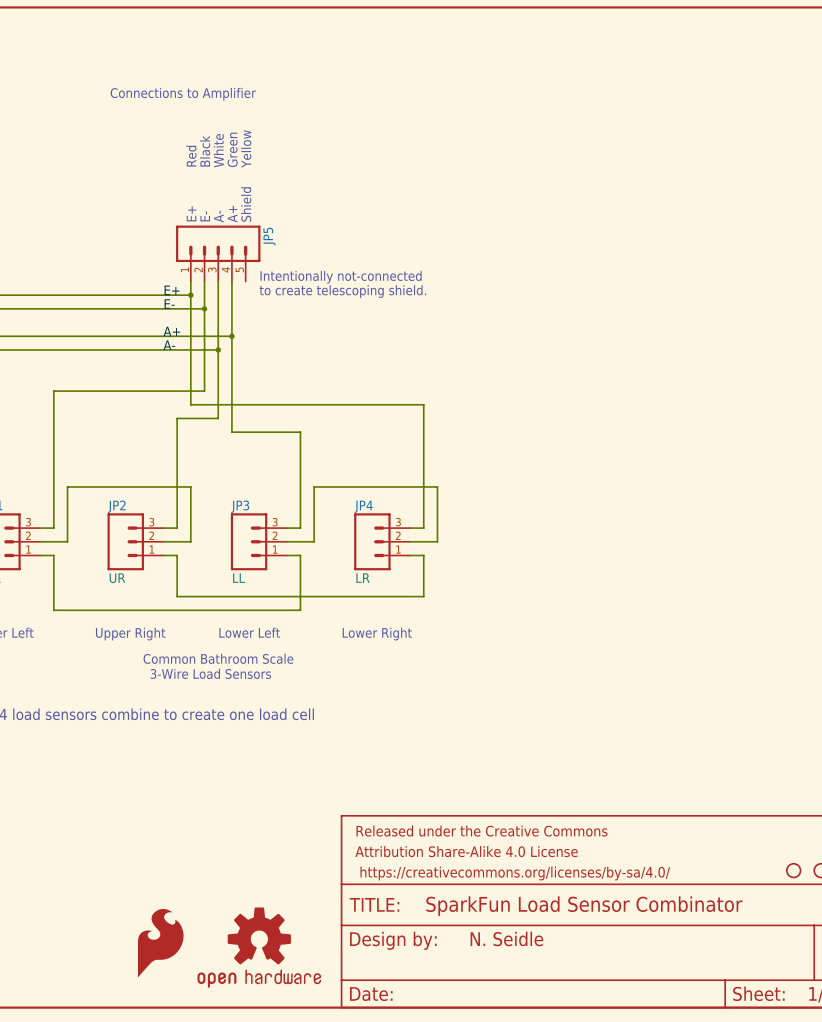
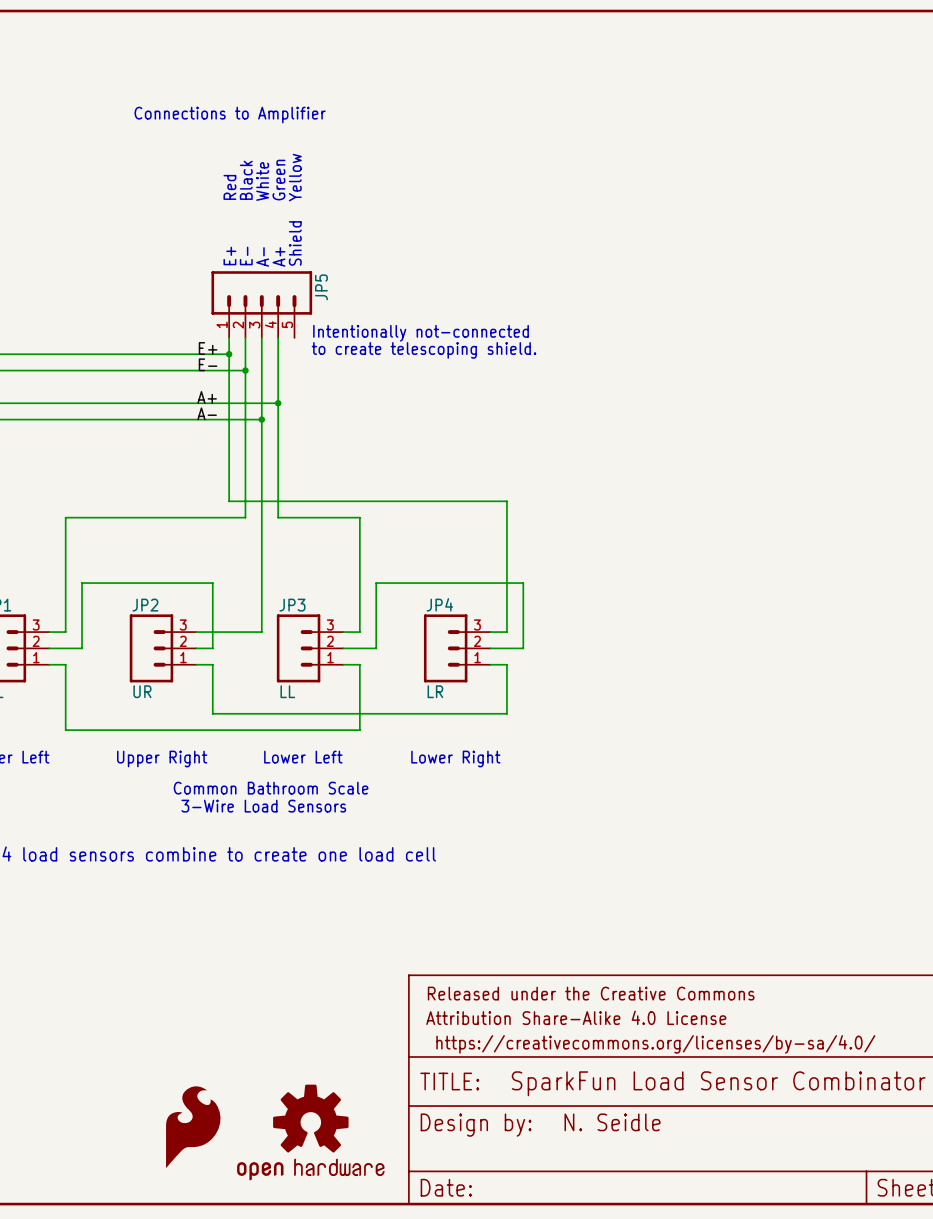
wire: (204, 391) (53, 391) (53, 432) -> (245, 468) (245, 517) (65, 517)
wire: (190, 404) (423, 404) (423, 418) -> (212, 648) (212, 632) (261, 632) (261, 501) (506, 501)
wire: (190, 418) (177, 418) (177, 486) (190, 486) (190, 541) (177, 541) -> (229, 501) (229, 484)

